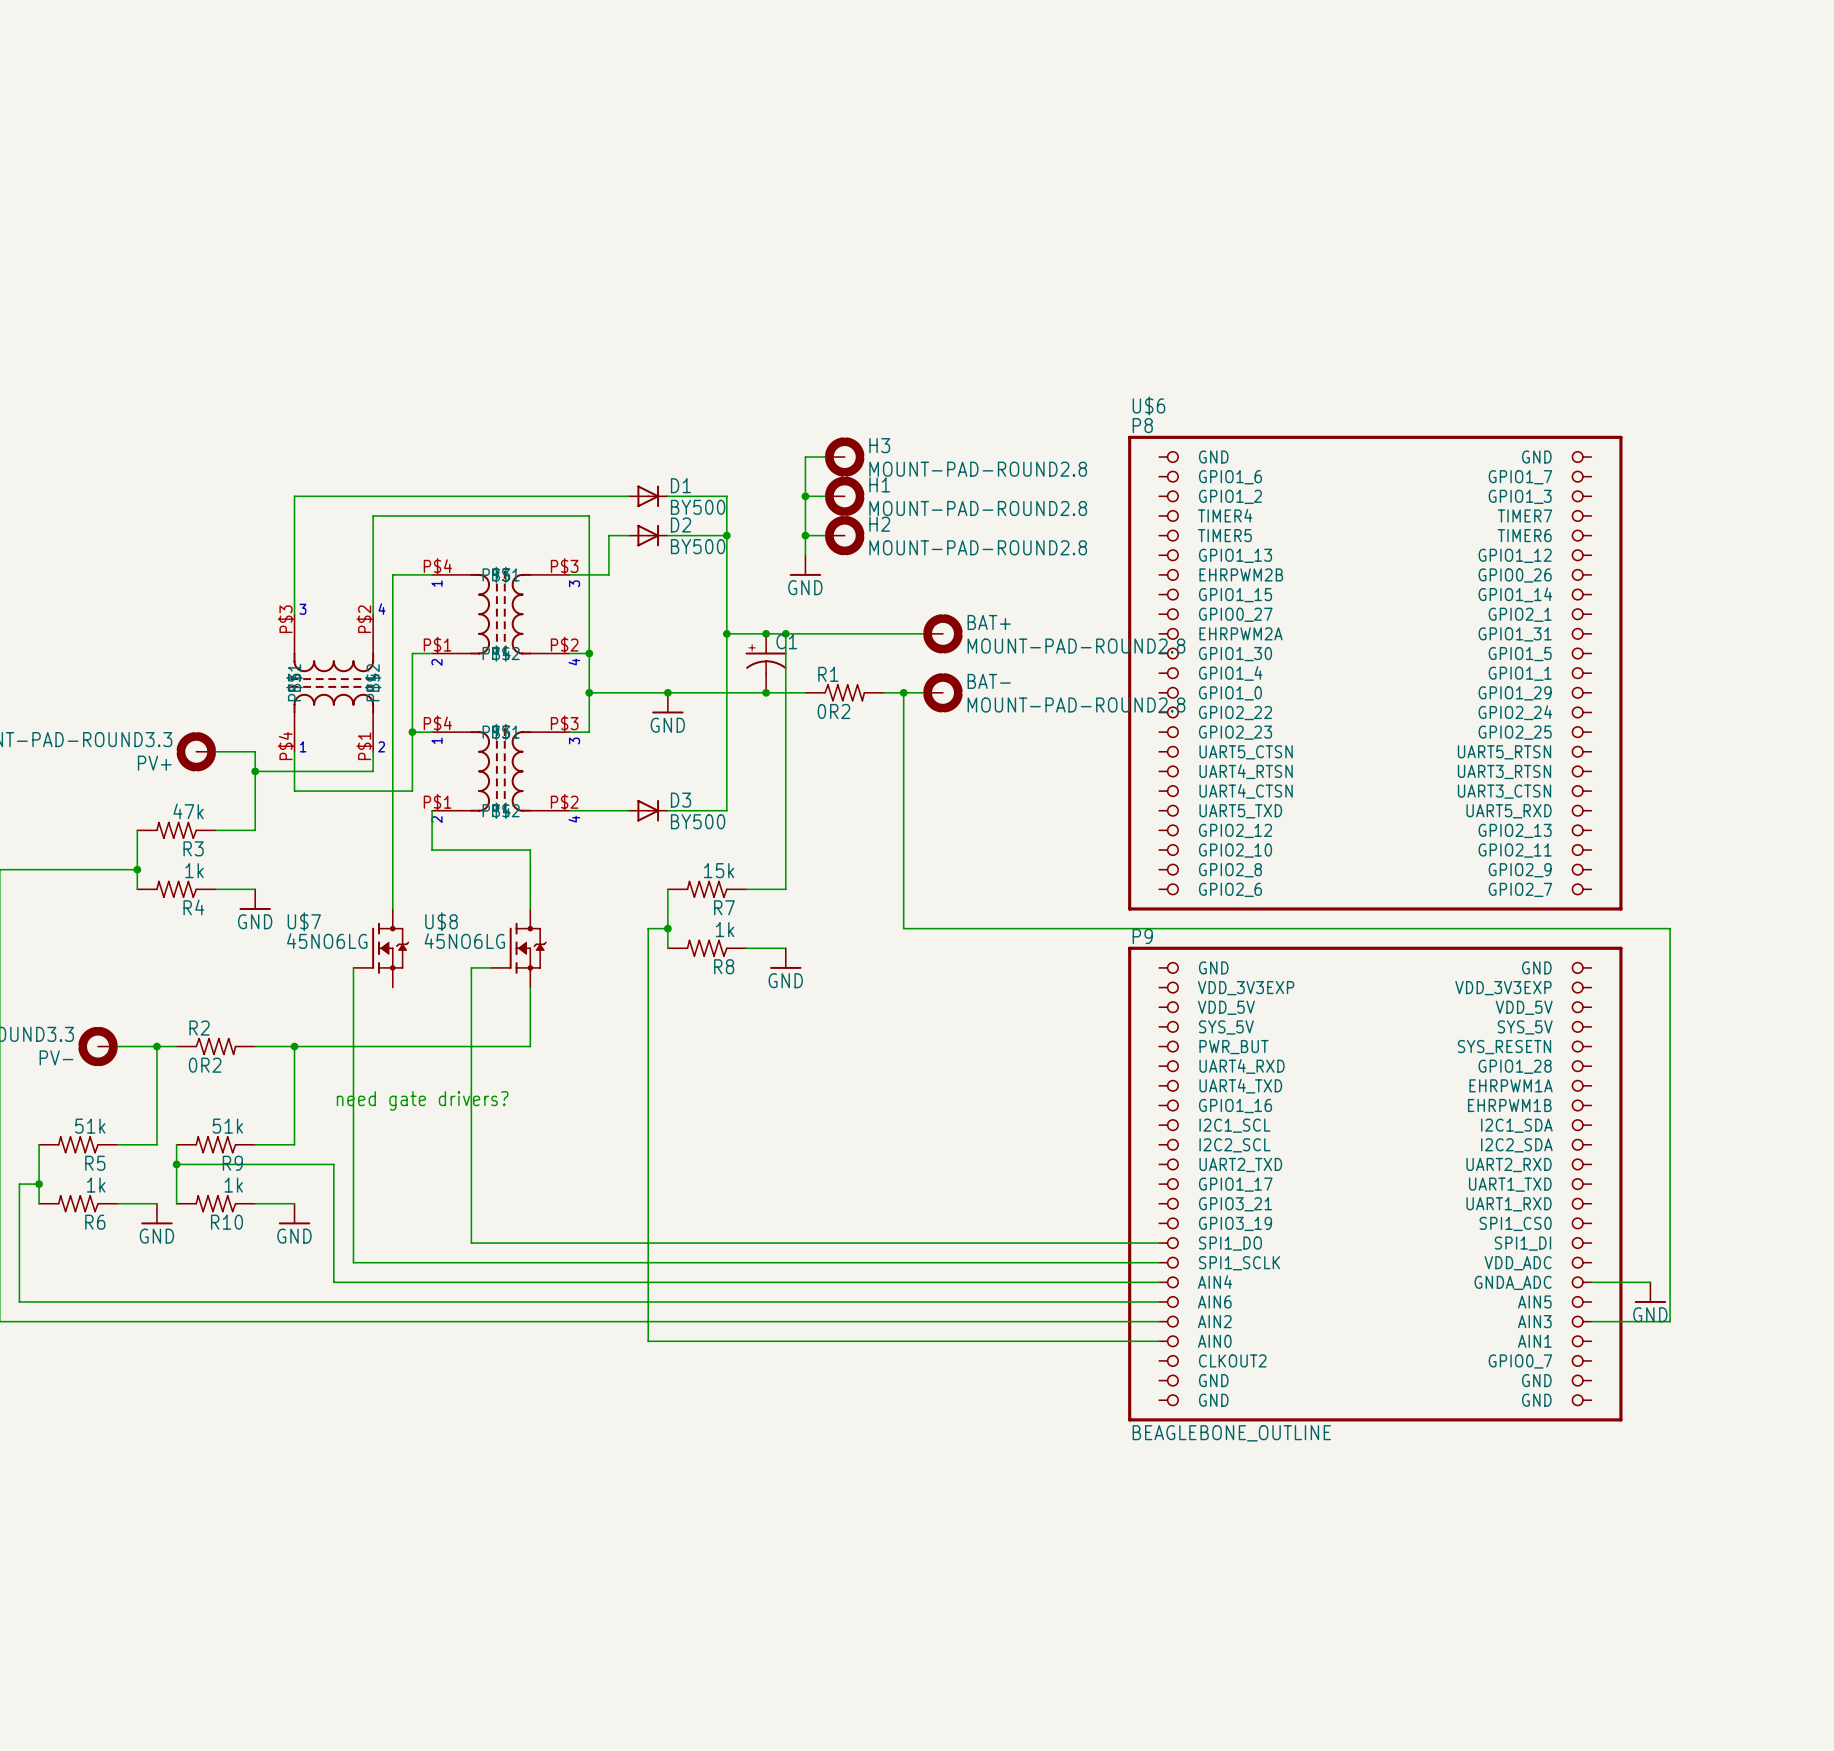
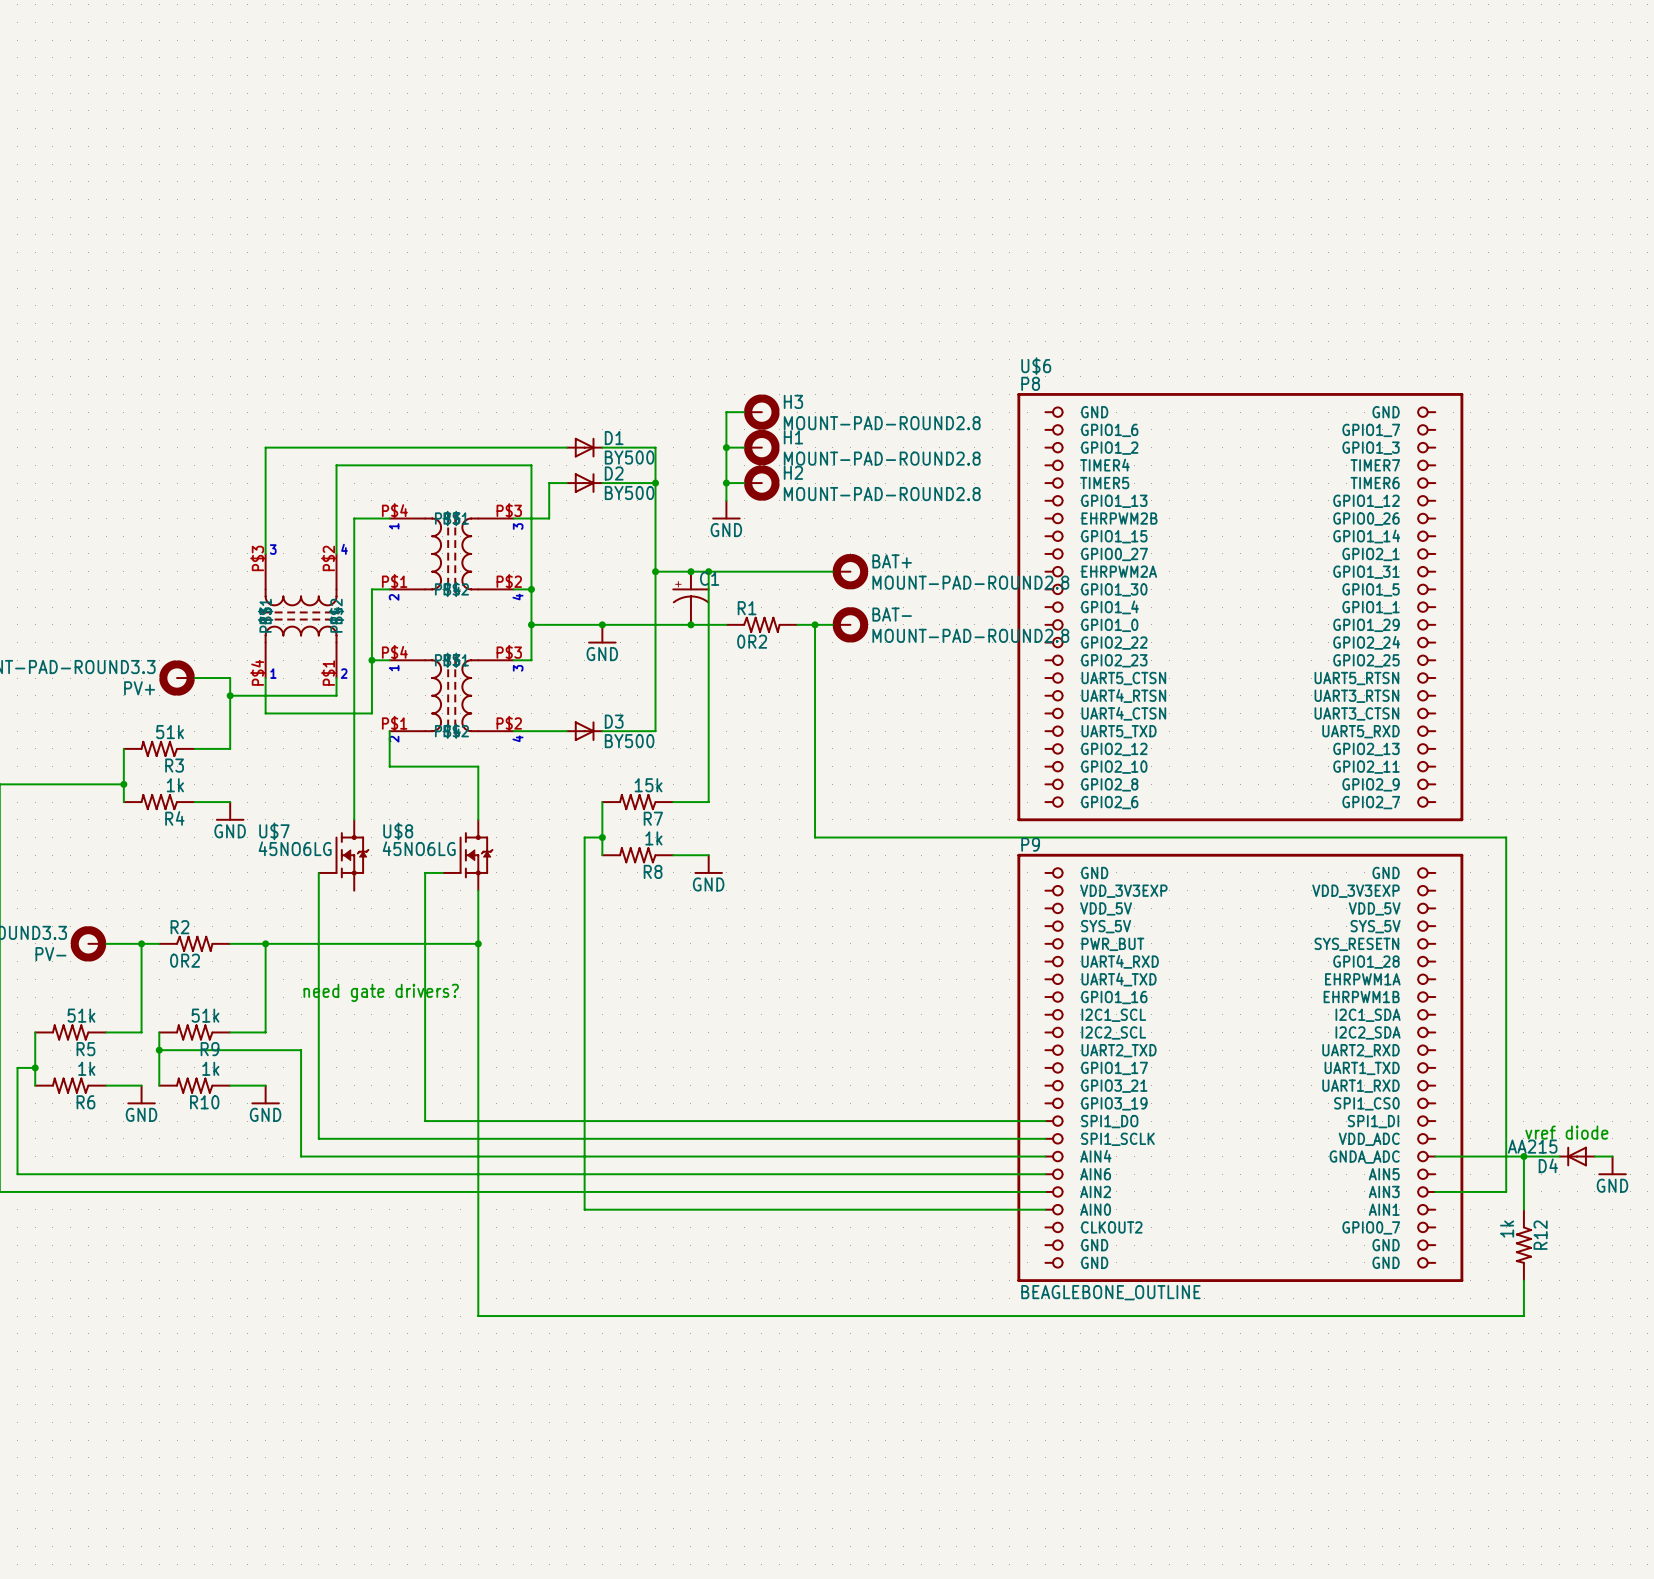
R3 value: 47k (188, 811) -> 51k (170, 732)
wire: none -> (478, 943) (478, 1316) (1523, 1316) (1523, 1280)
junction: none -> (478, 943)
text: none -> vref diode (1566, 1132)
wire: none -> (1488, 1156) (1559, 1156)
wire: none -> (1523, 1156) (1523, 1209)
junction: none -> (1523, 1156)
D4: none -> AA215 (1577, 1156)
wire: none -> (1594, 1156) (1612, 1156)
power symbol position: GND (1650, 1292) -> GND (1612, 1165)
R12: none -> 1k (1523, 1245)

